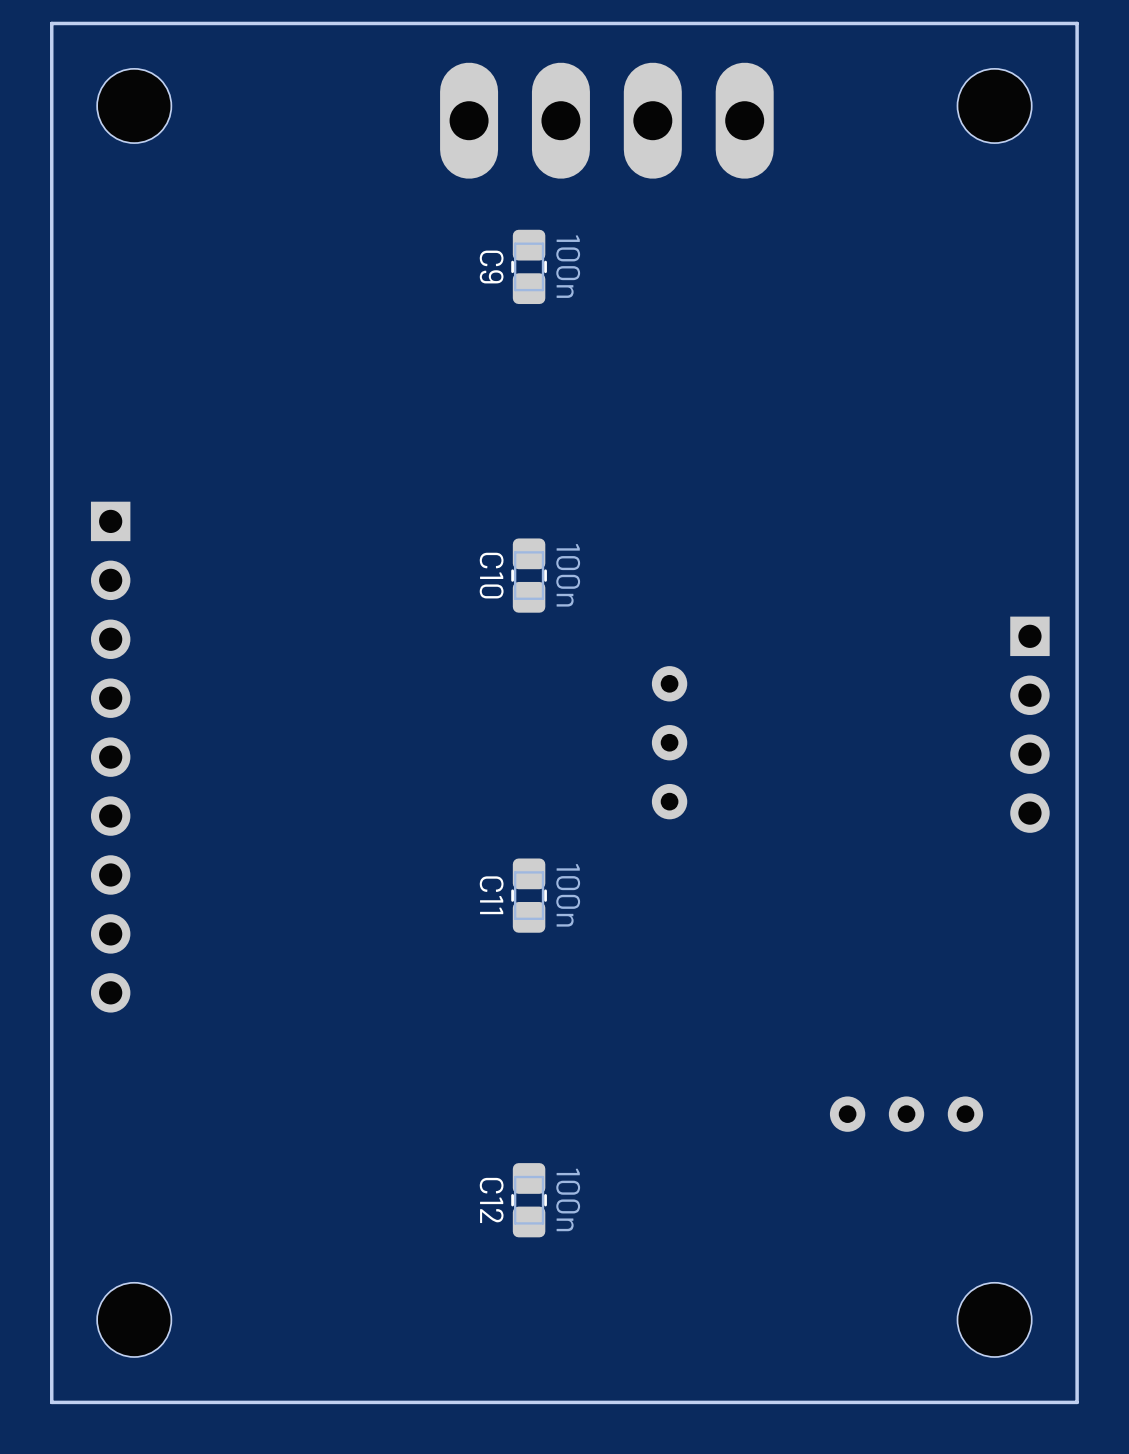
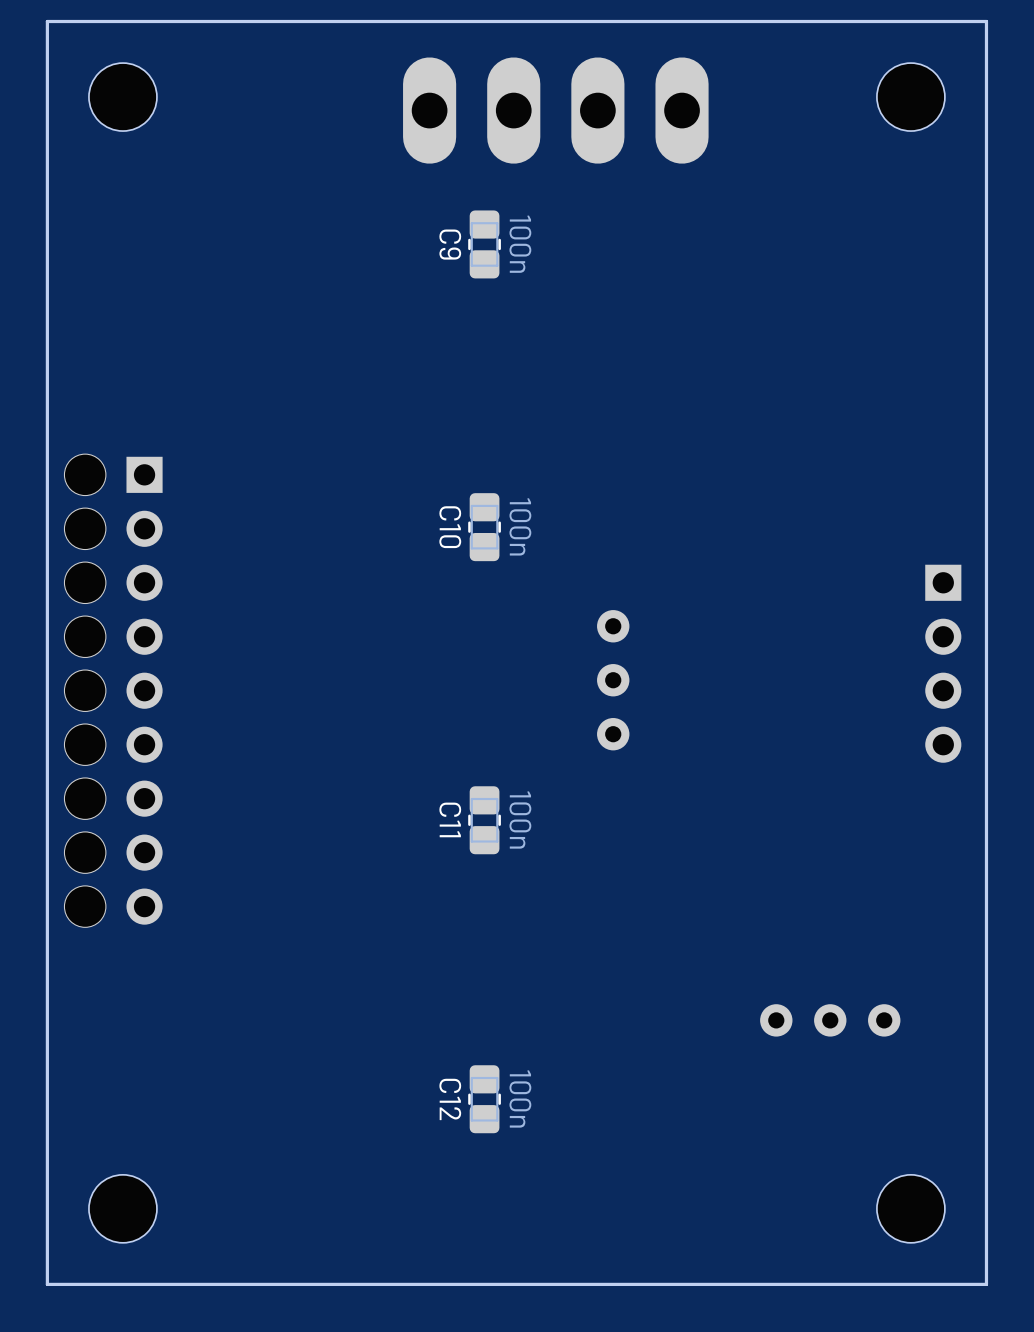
part footprint: [90, 501, 131, 1013] -> [63, 669, 107, 712]
part: none -> (85, 474)
part: none -> (85, 528)
part: none -> (85, 582)
part: none -> (85, 636)
part: none -> (144, 690)
part: none -> (85, 744)
part: none -> (85, 798)
part: none -> (85, 852)
part: none -> (85, 906)

